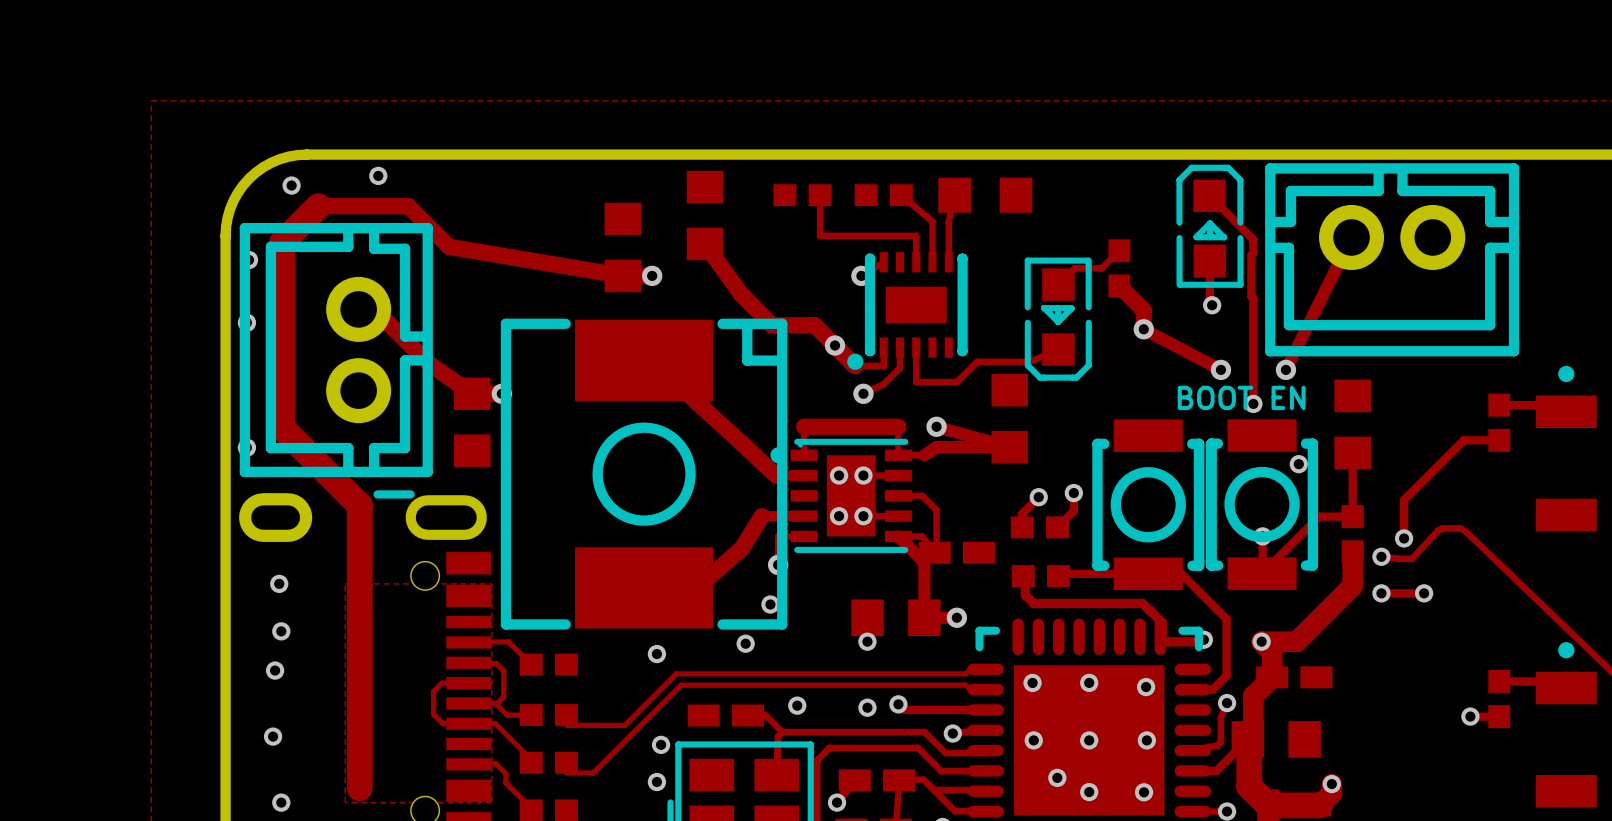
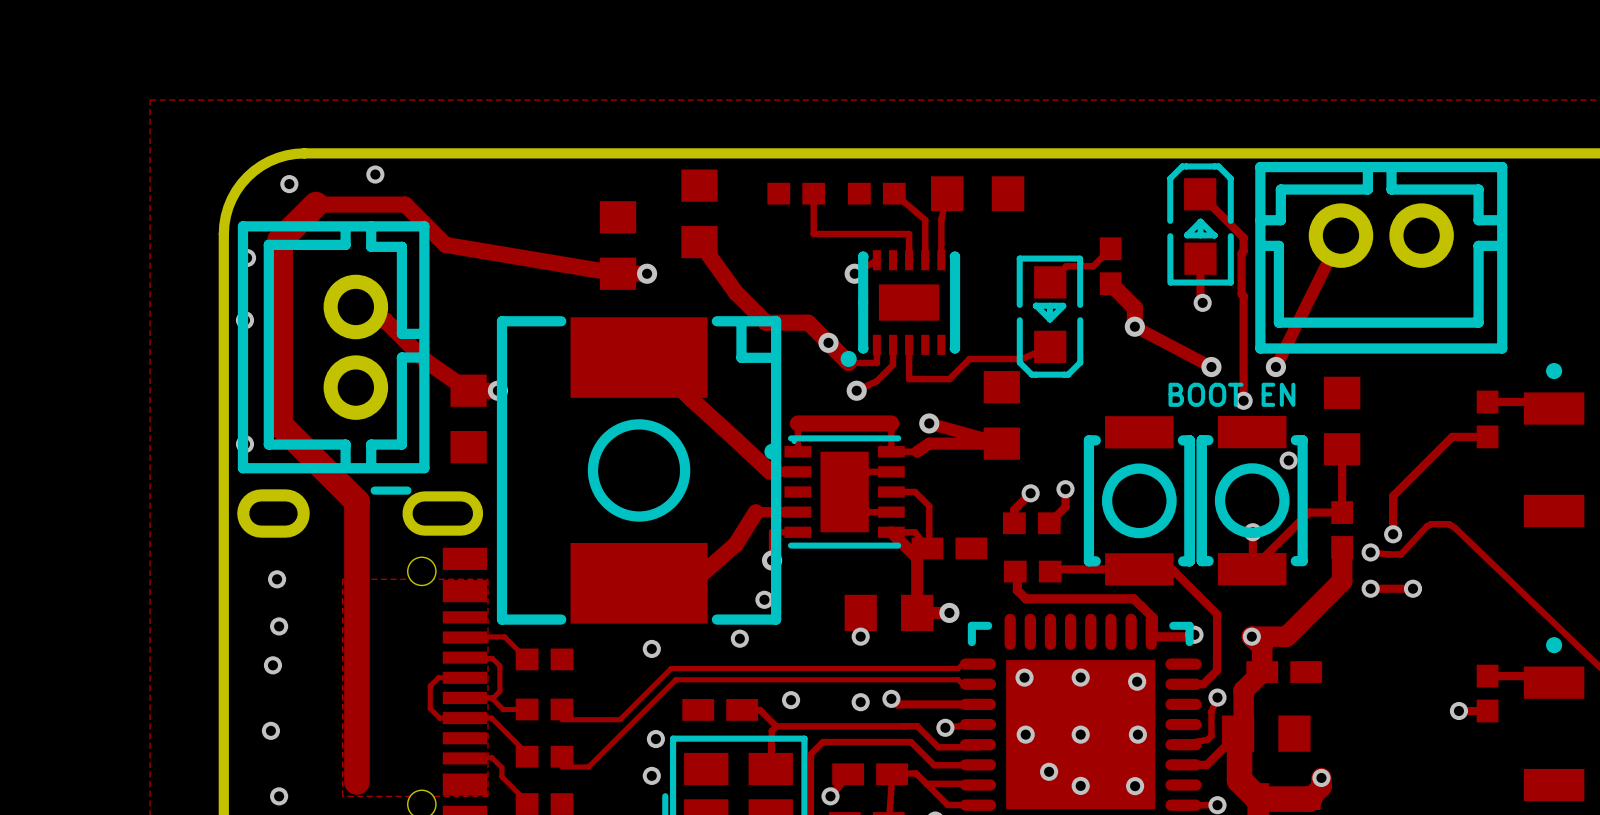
via: (839, 475) -> none
via: (863, 475) -> none
via: (839, 516) -> none
via: (863, 516) -> none

